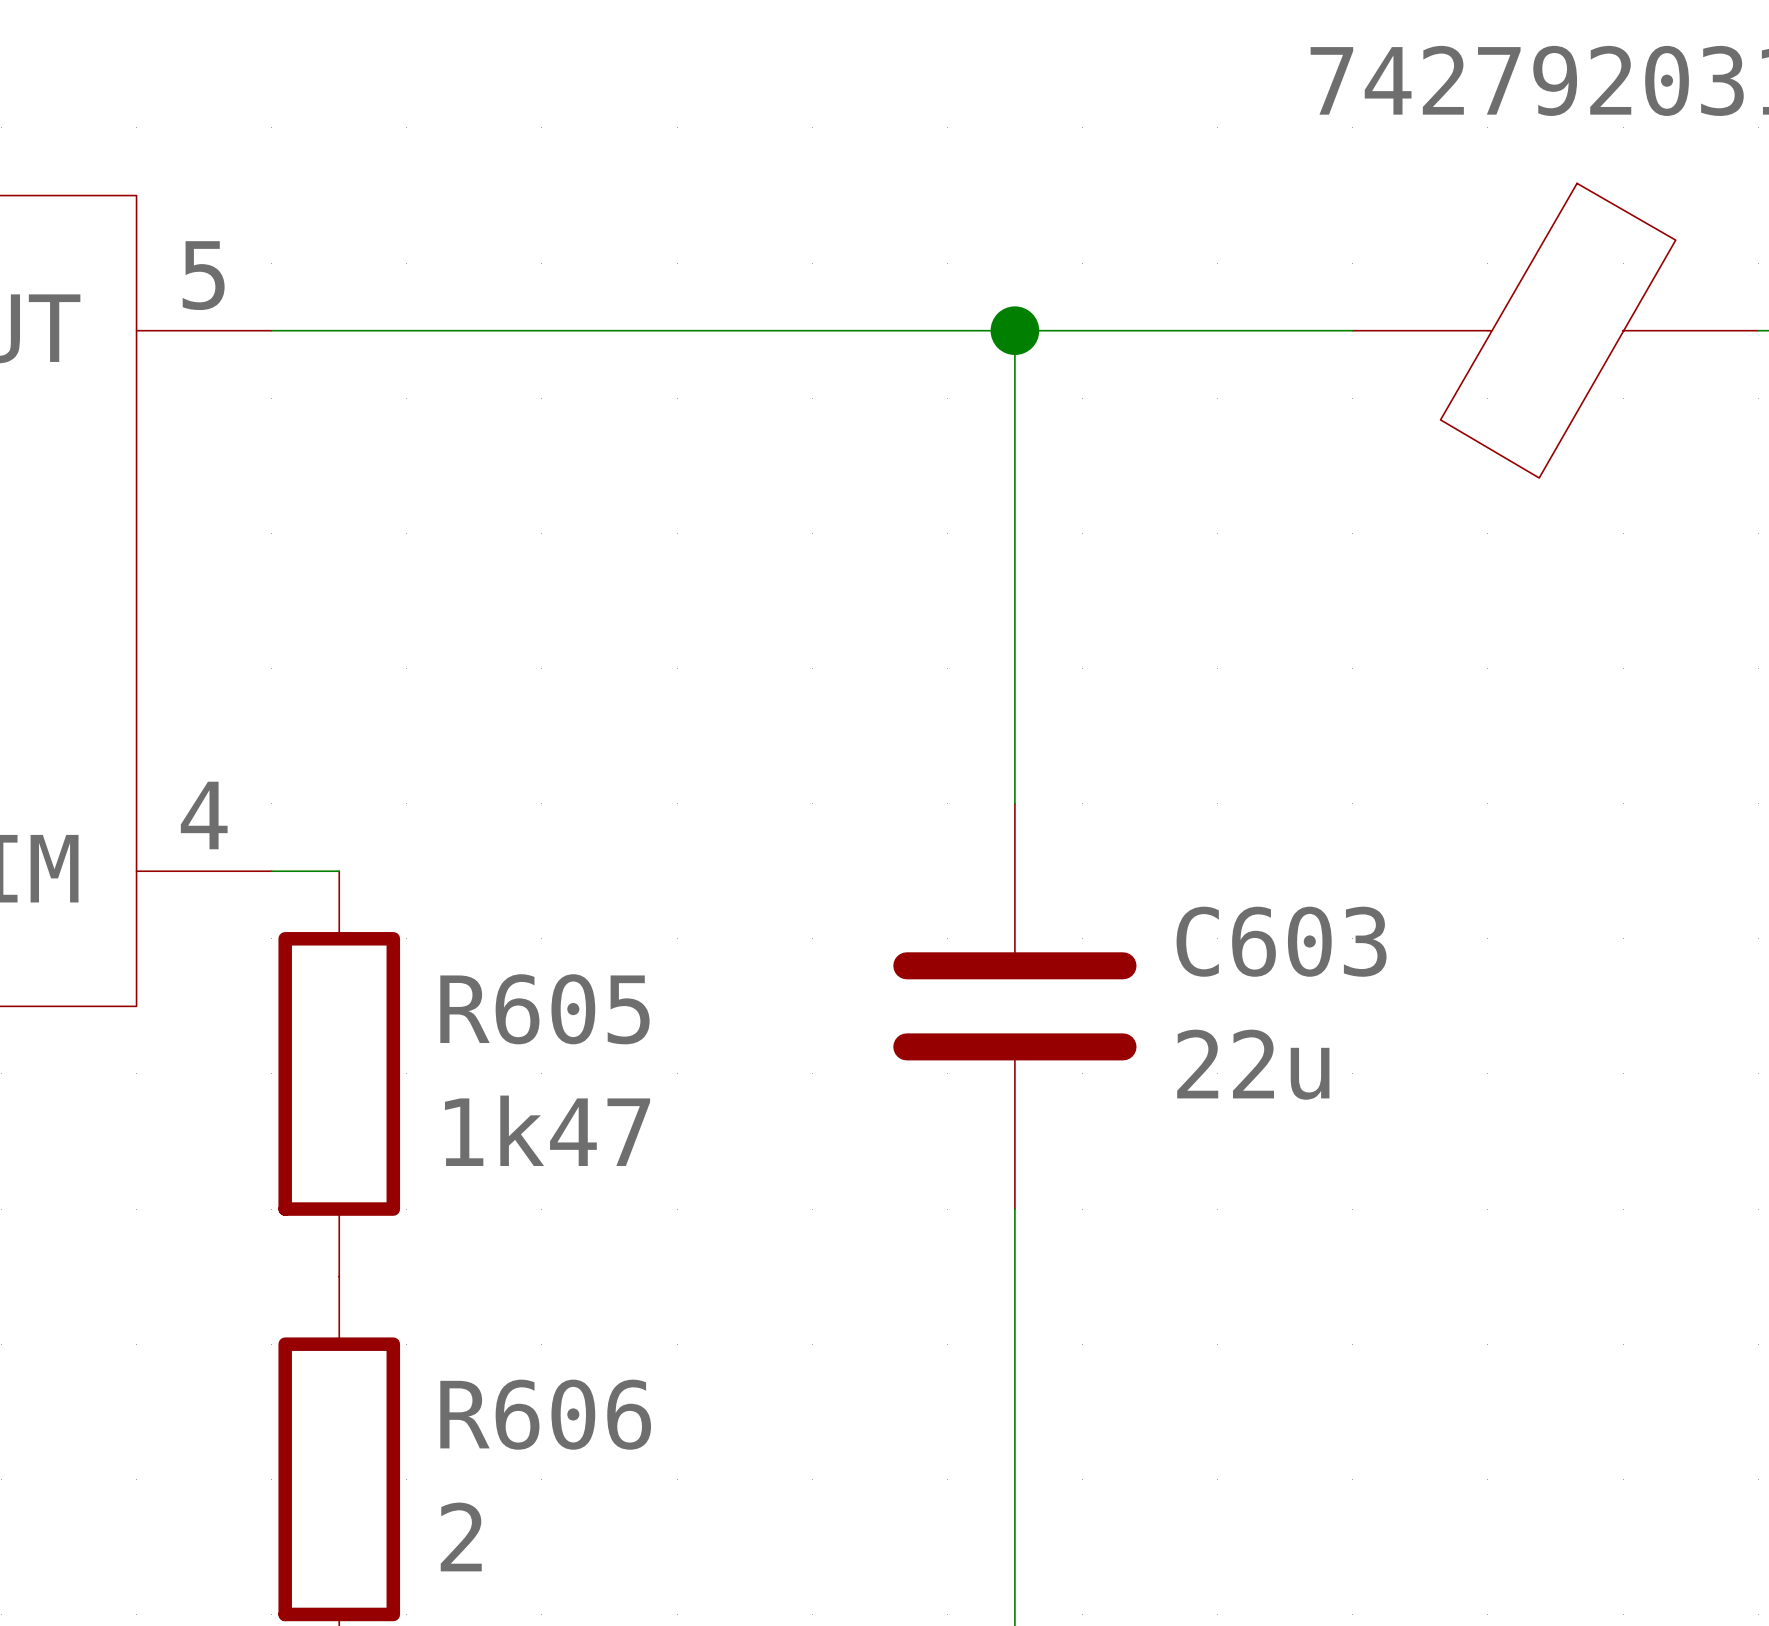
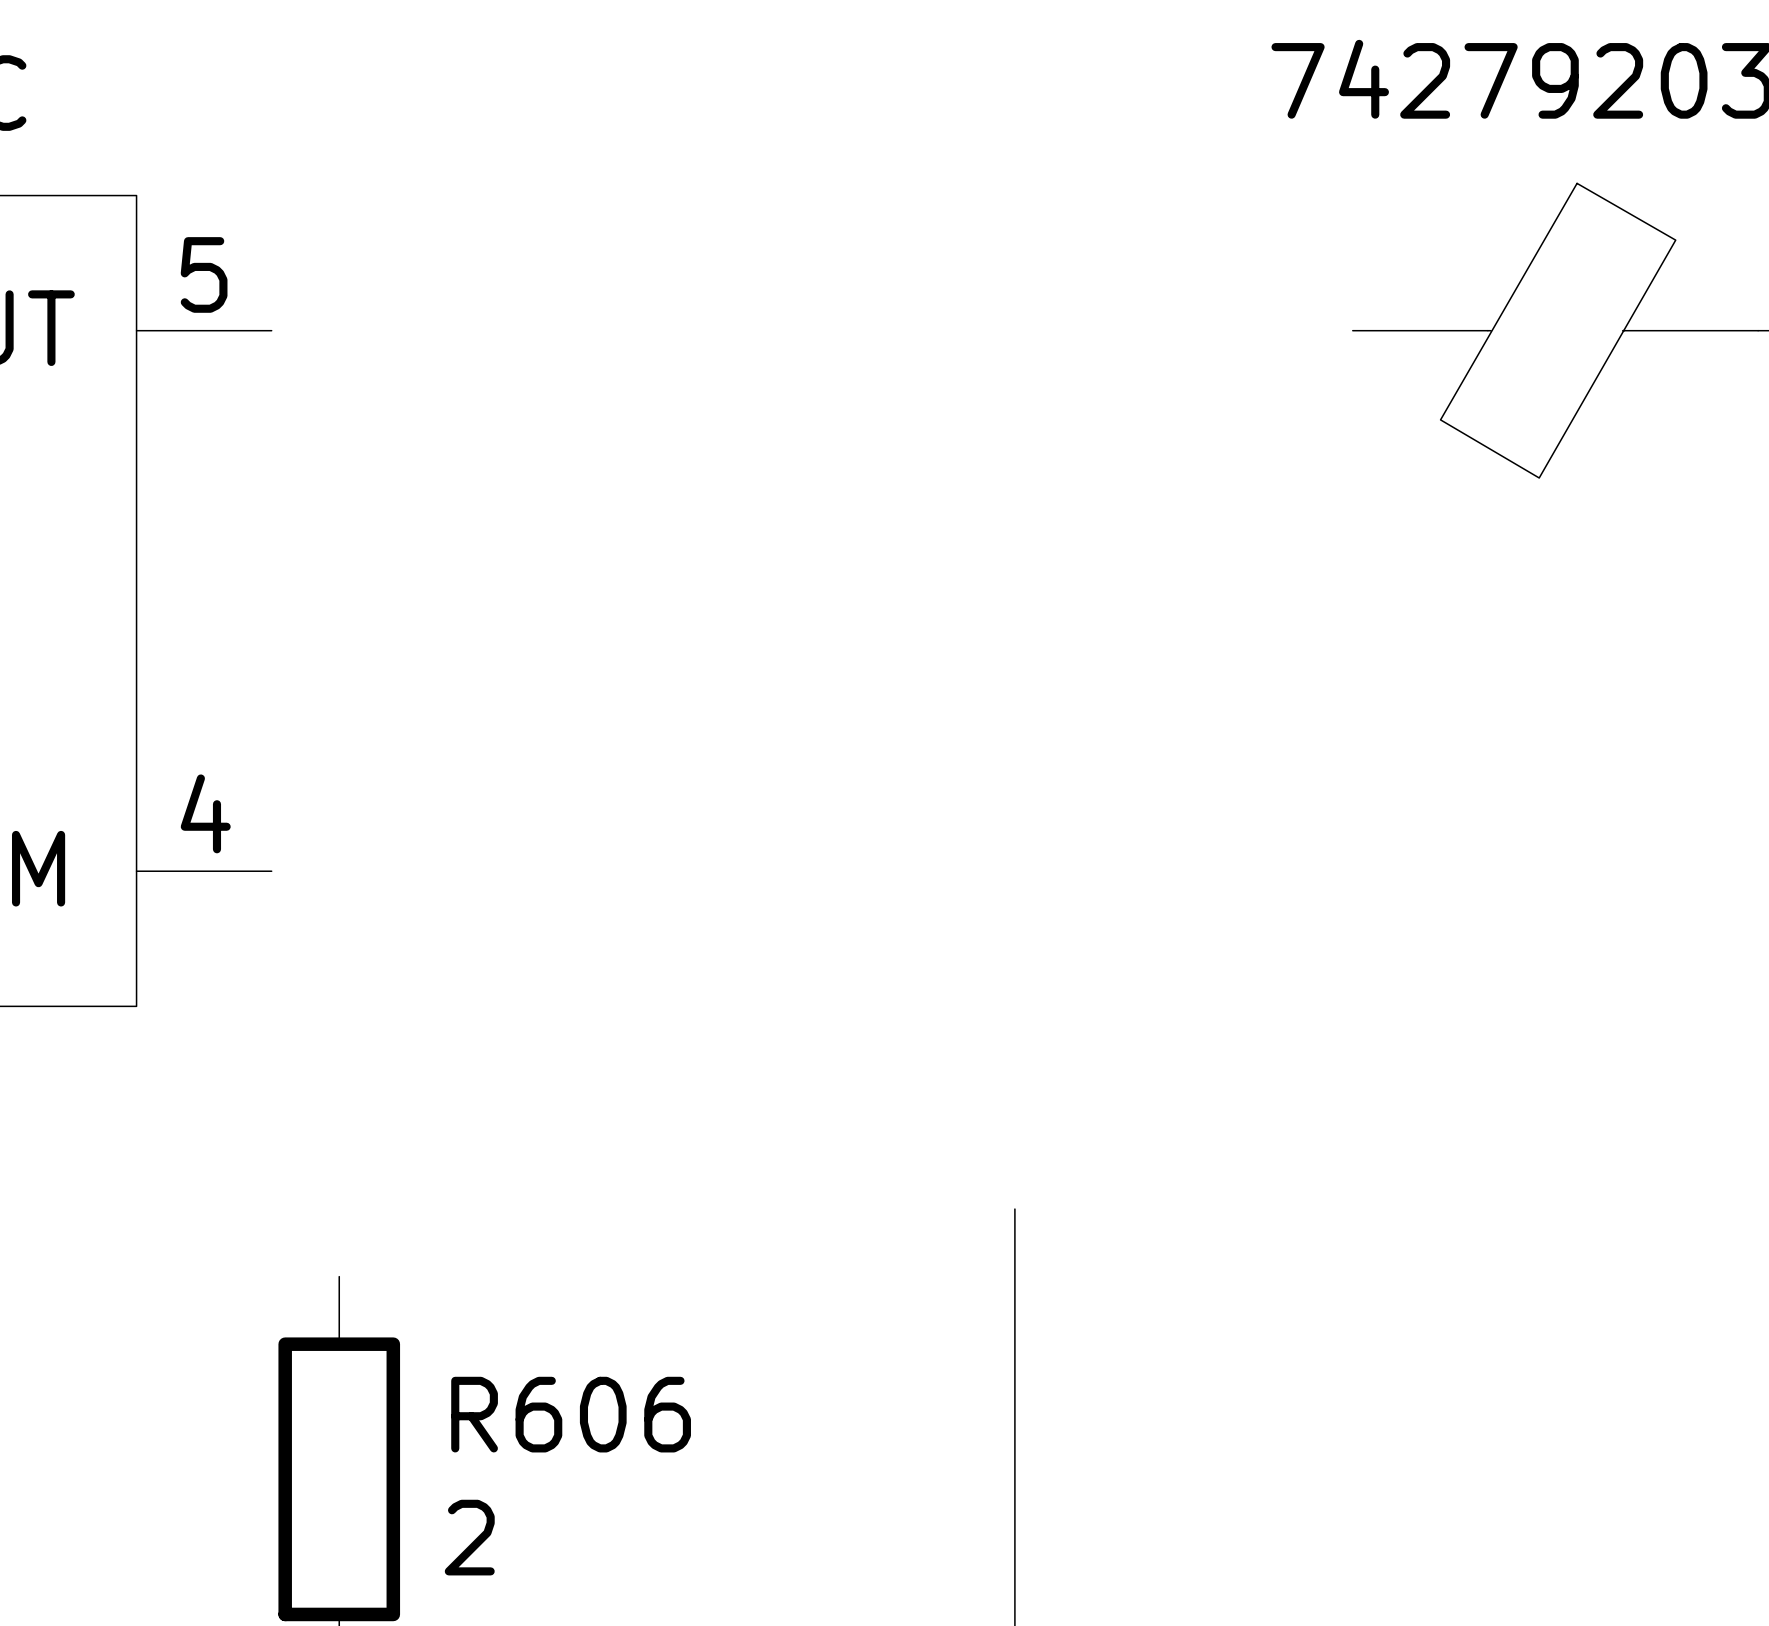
wire: (271, 330) (1352, 330) -> none
wire: (1014, 330) (1014, 803) -> none
junction: (1014, 330) -> none
wire: (271, 871) (339, 871) -> none
C603: 22u (1014, 1006) -> none
R605: 1k47 (339, 1073) -> none

